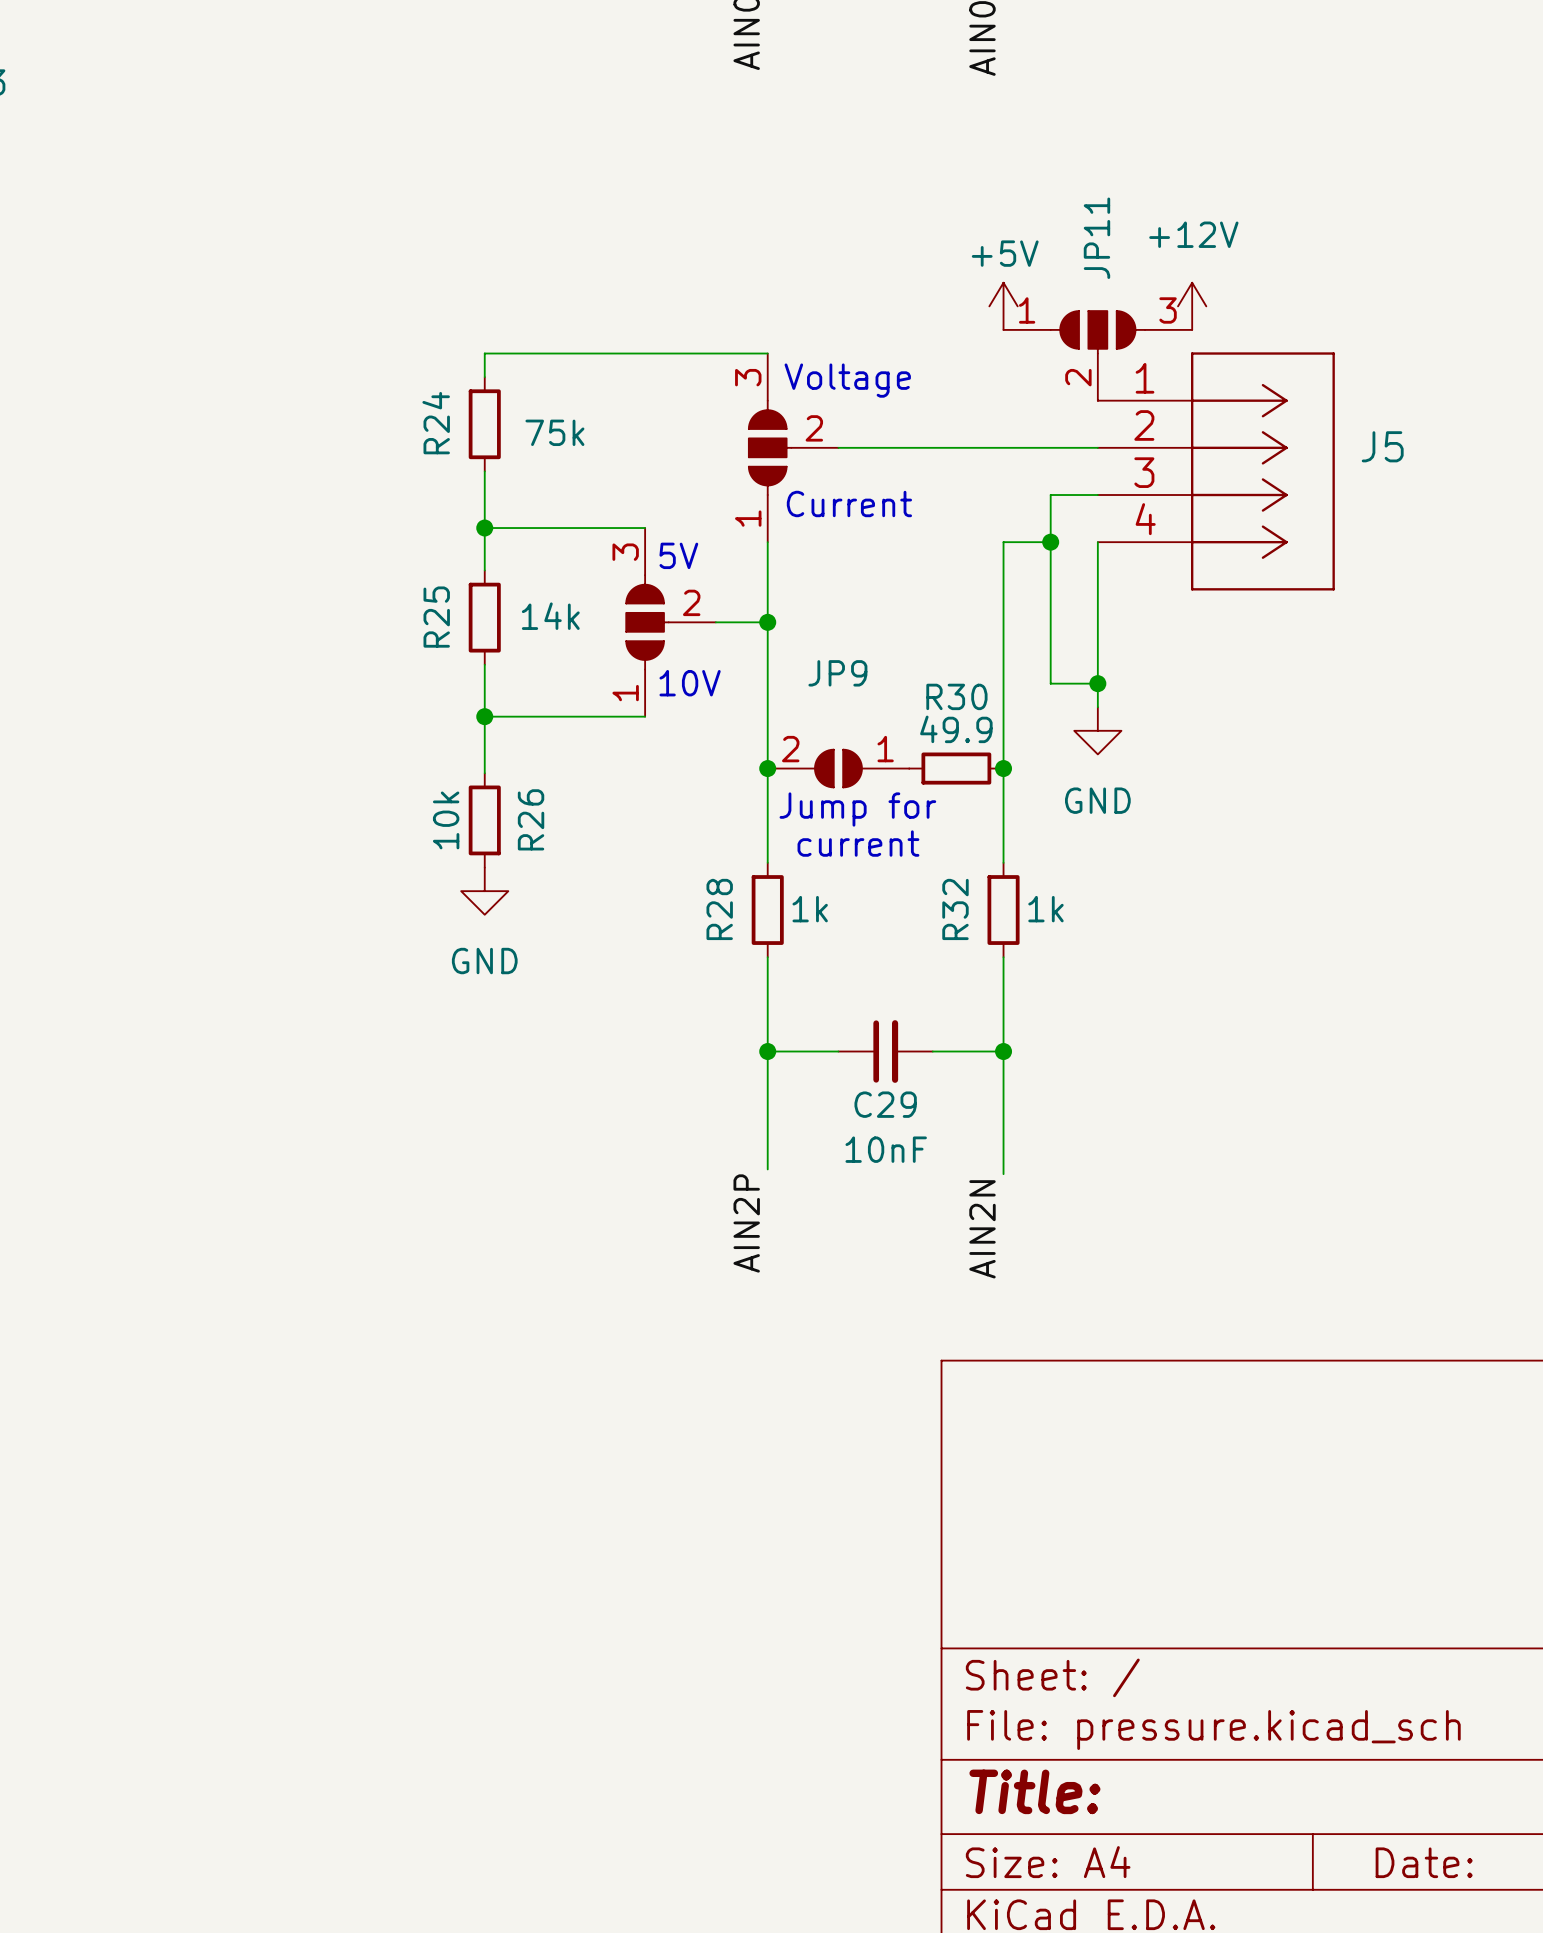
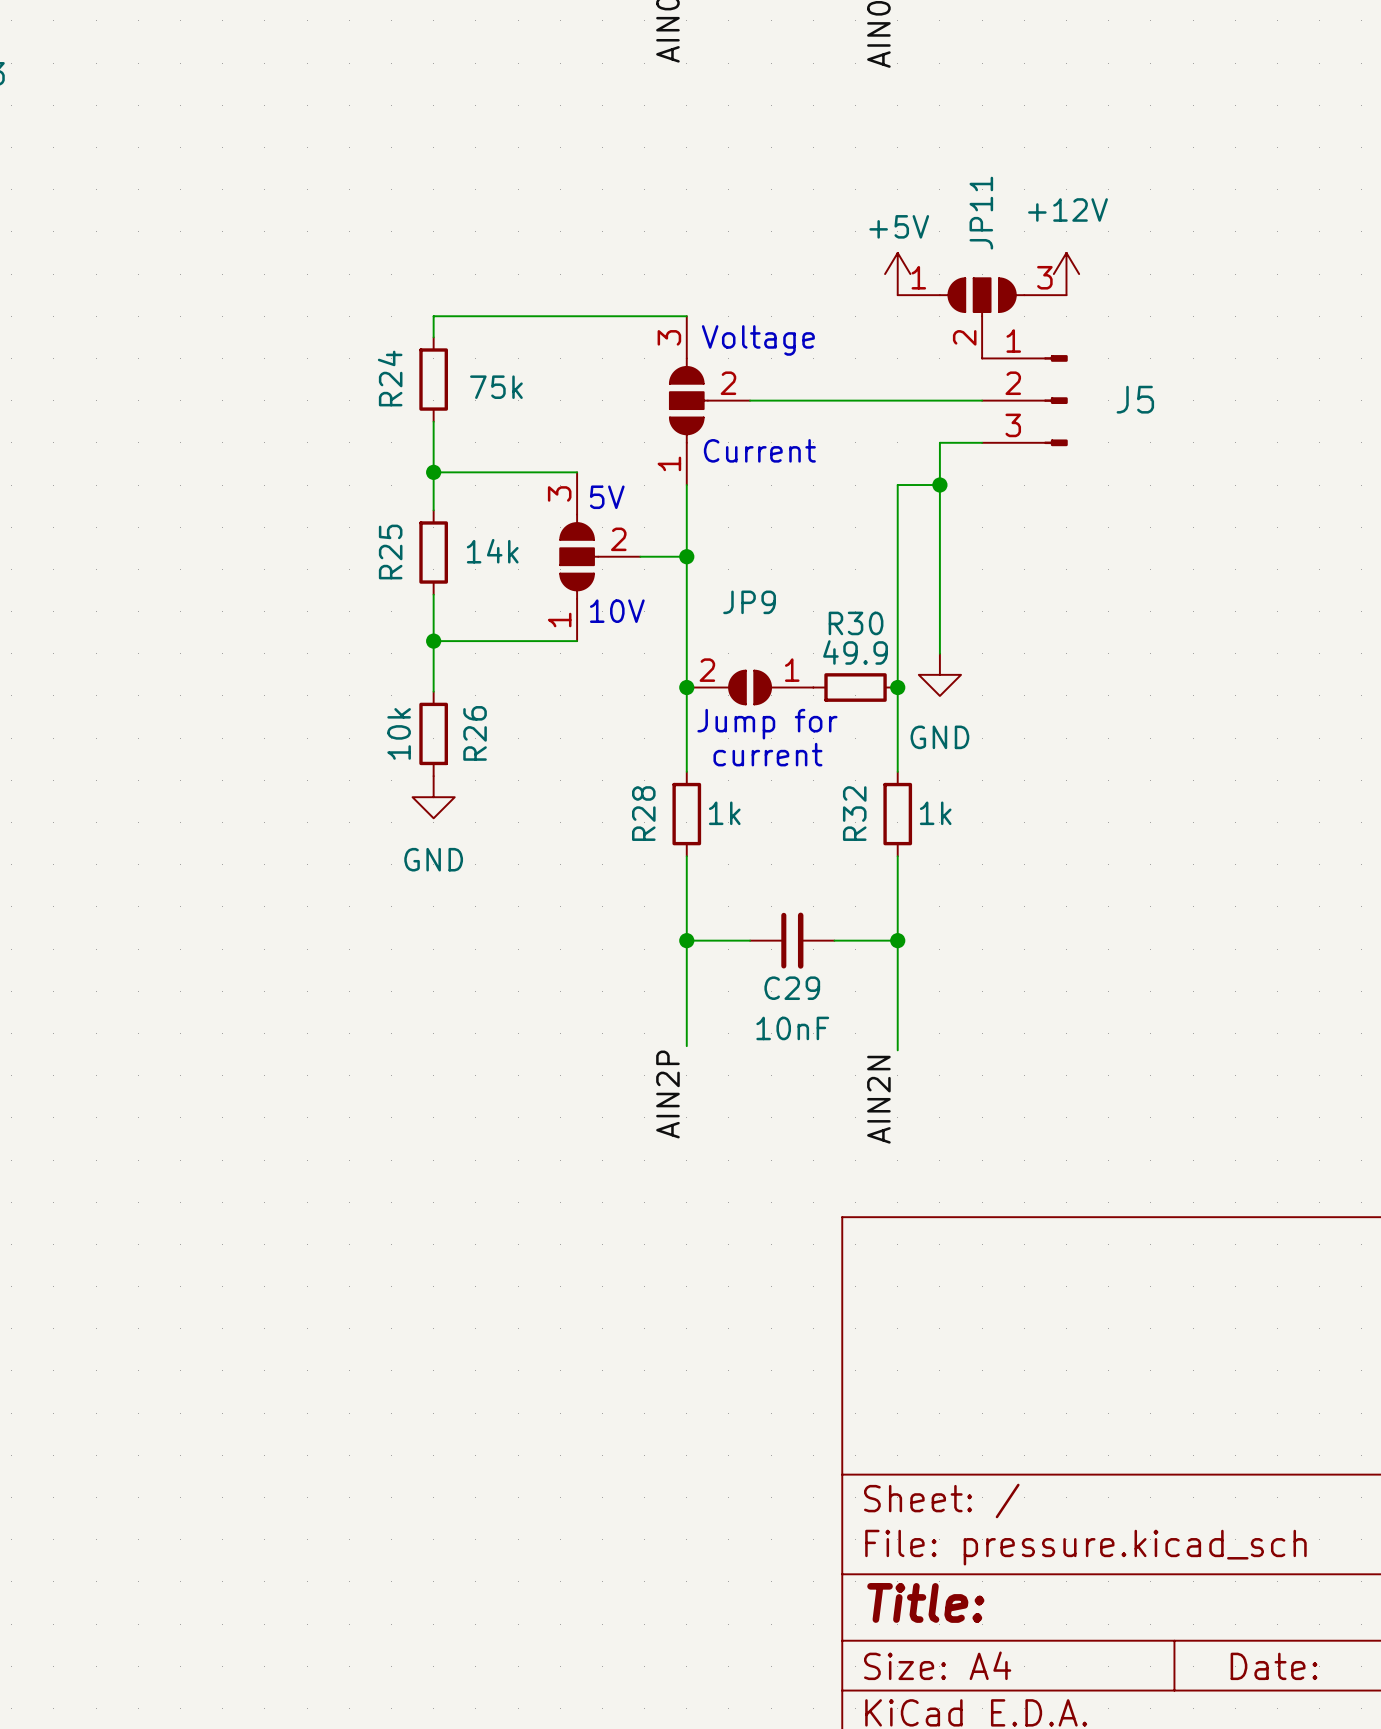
J5 symbol: [1097, 352, 1335, 591] -> [982, 355, 1068, 447]
J5 name position: J5 (1382, 446) -> J5 (1135, 399)
wire: (1097, 542) (1097, 707) -> none
wire: (1050, 683) (1097, 683) -> (939, 611) (939, 653)
junction: (1097, 683) -> none
power symbol position: GND (1097, 730) -> GND (939, 674)

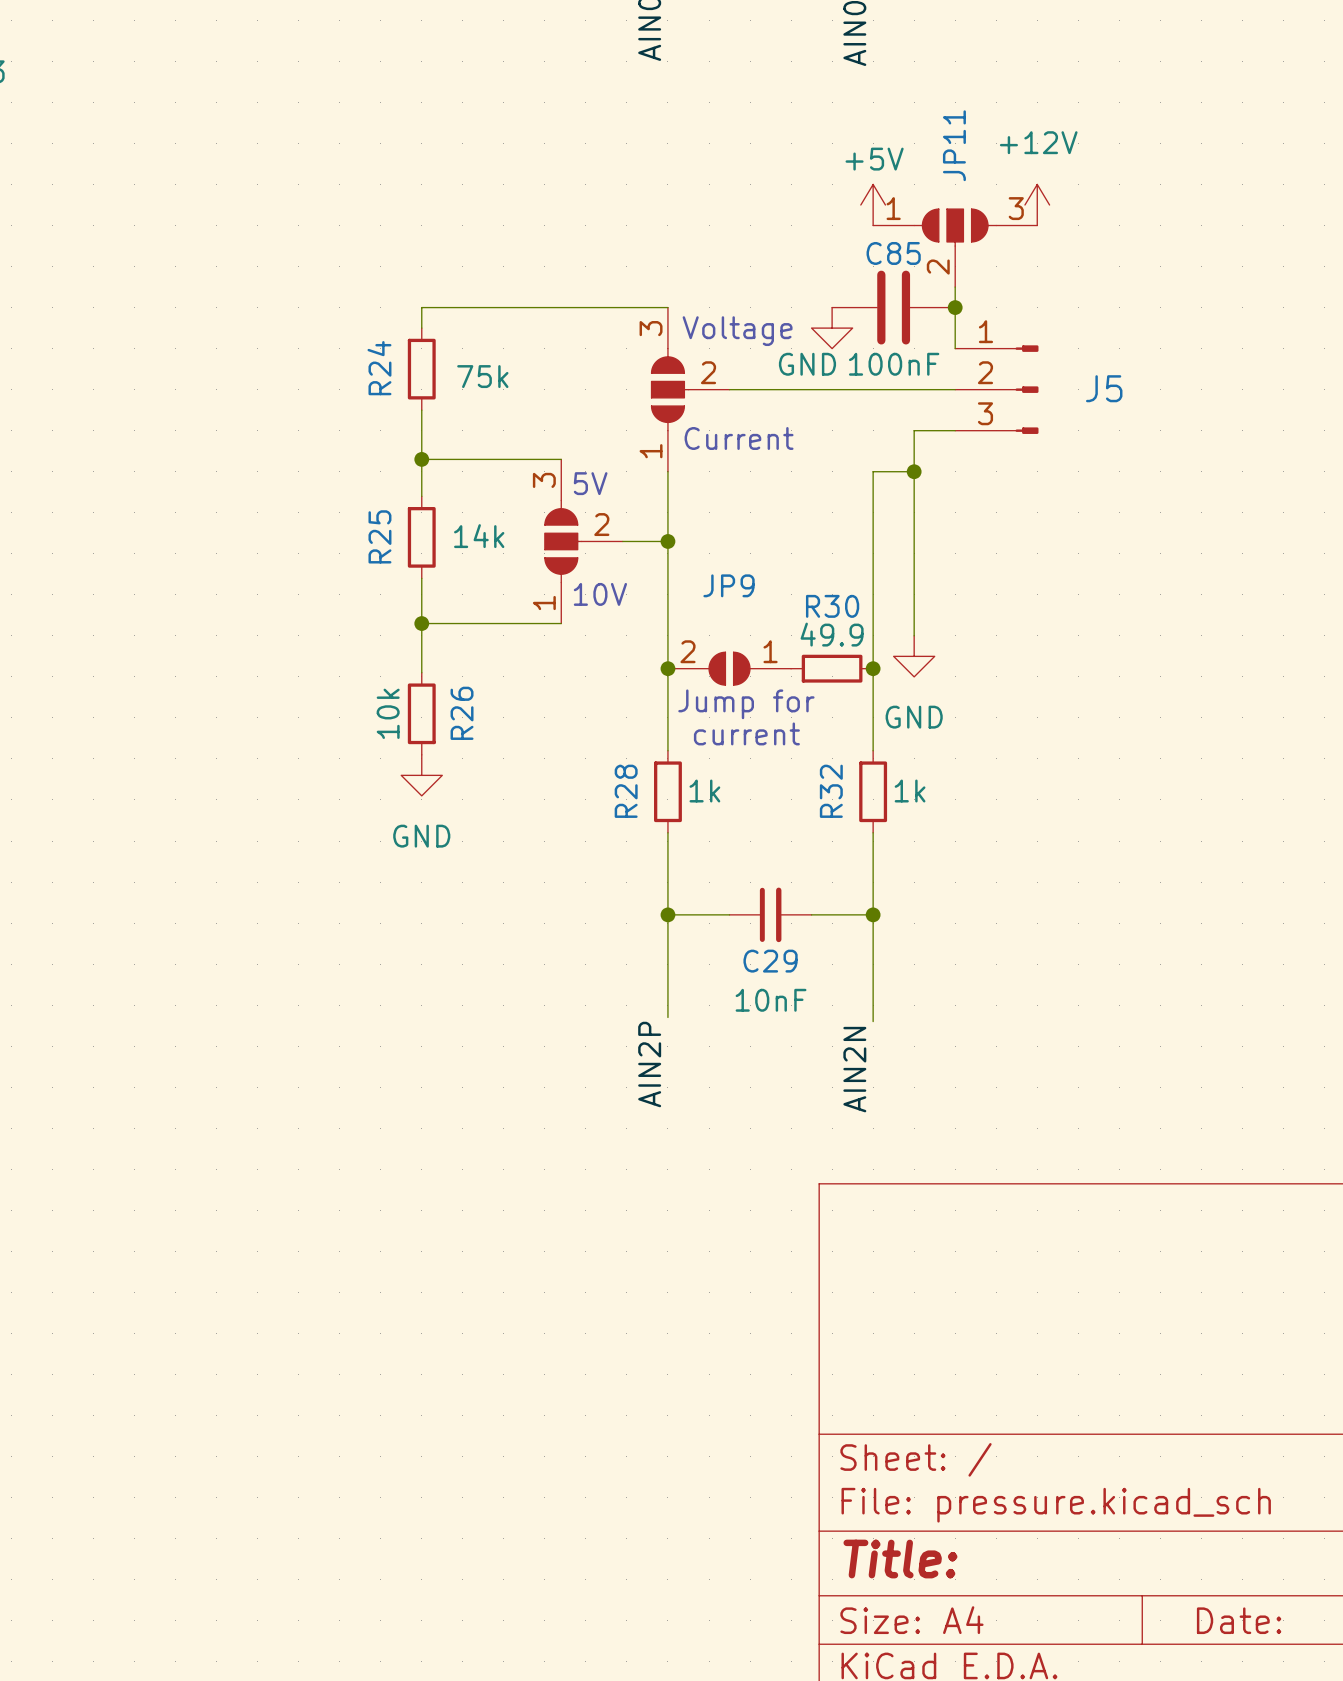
power symbol position: +5V (897, 274) -> +5V (873, 205)
power symbol position: +12V (1066, 274) -> +12V (1037, 205)
C85: none -> 100nF (893, 307)
junction: none -> (955, 307)
JP11 position: (982, 318) -> (955, 248)
power symbol: none -> GND (832, 328)

